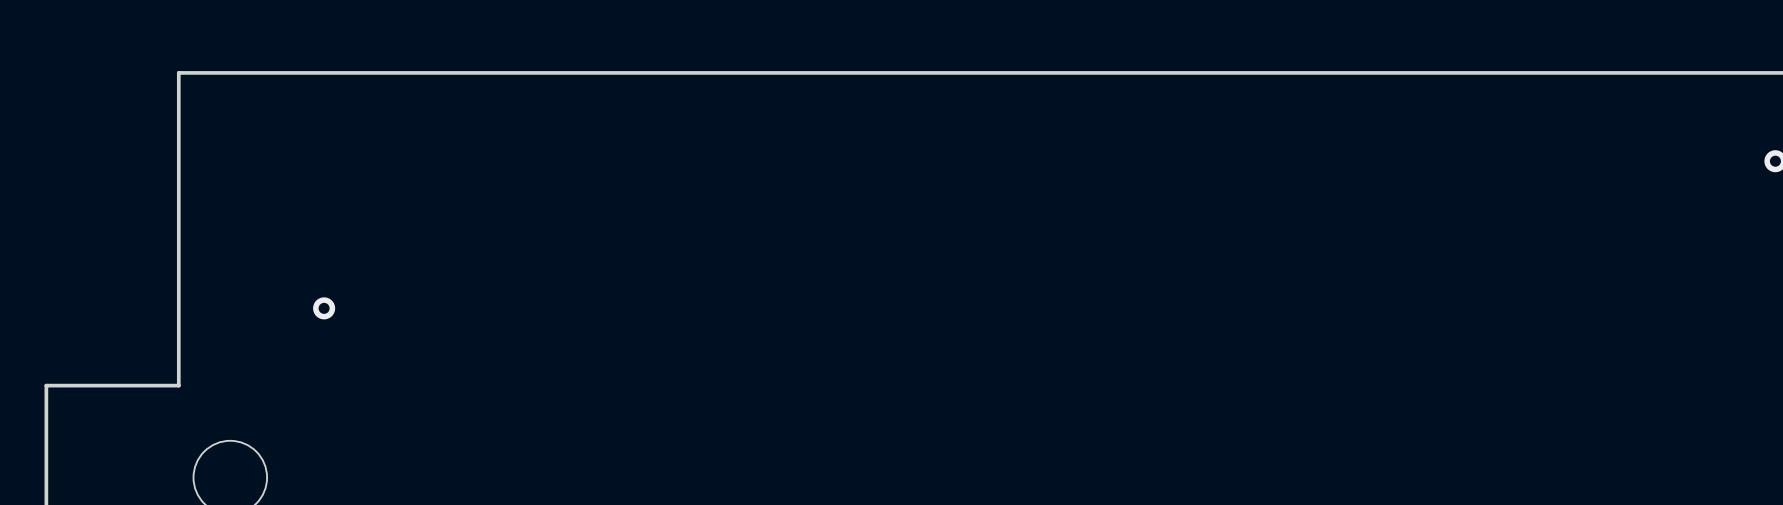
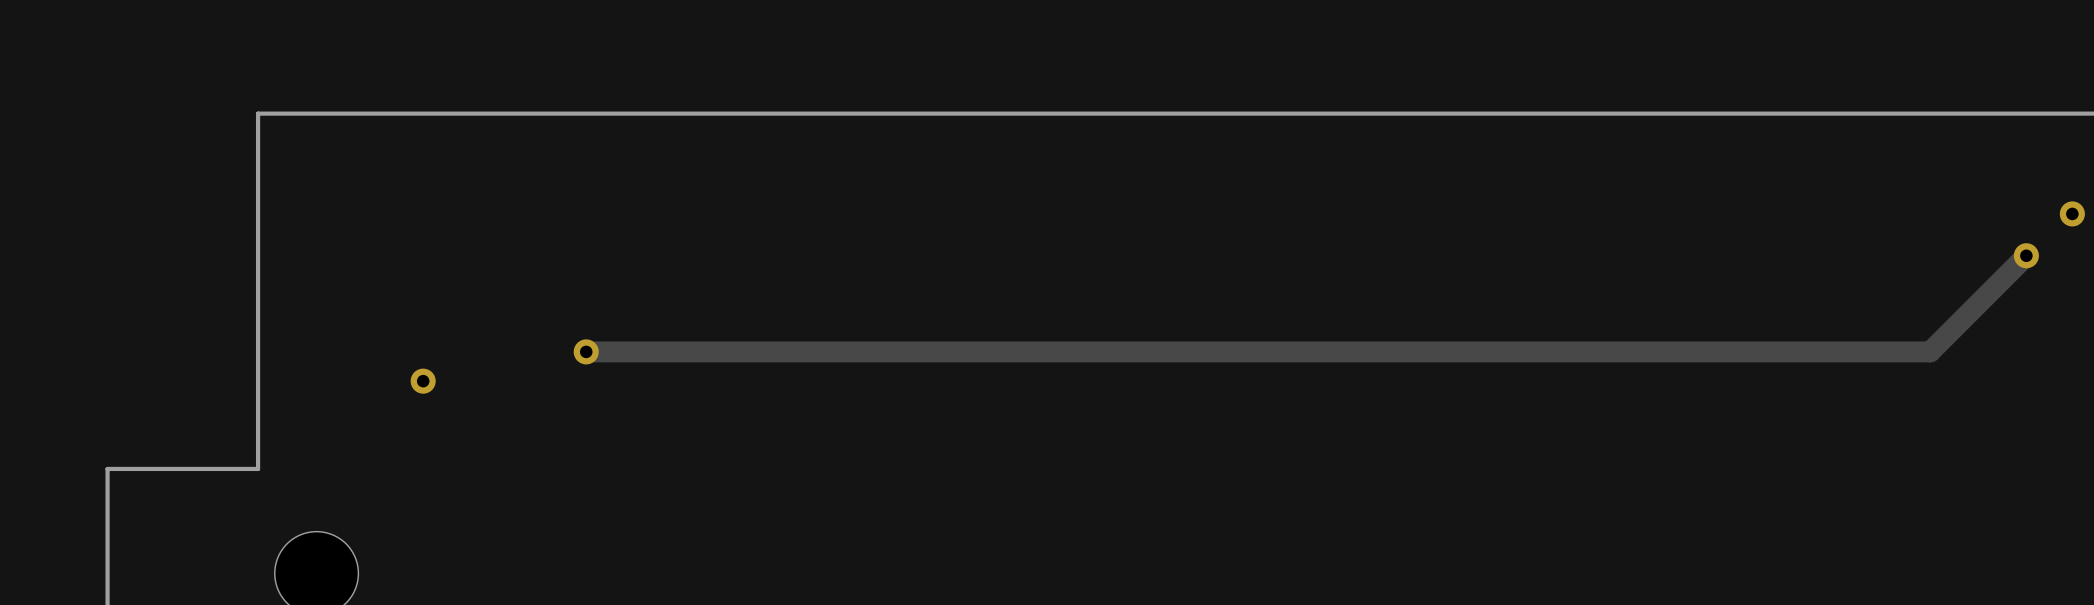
track: none -> (2026, 255) (1930, 351) (586, 351)
via: none -> (2026, 255)
via: none -> (586, 351)

